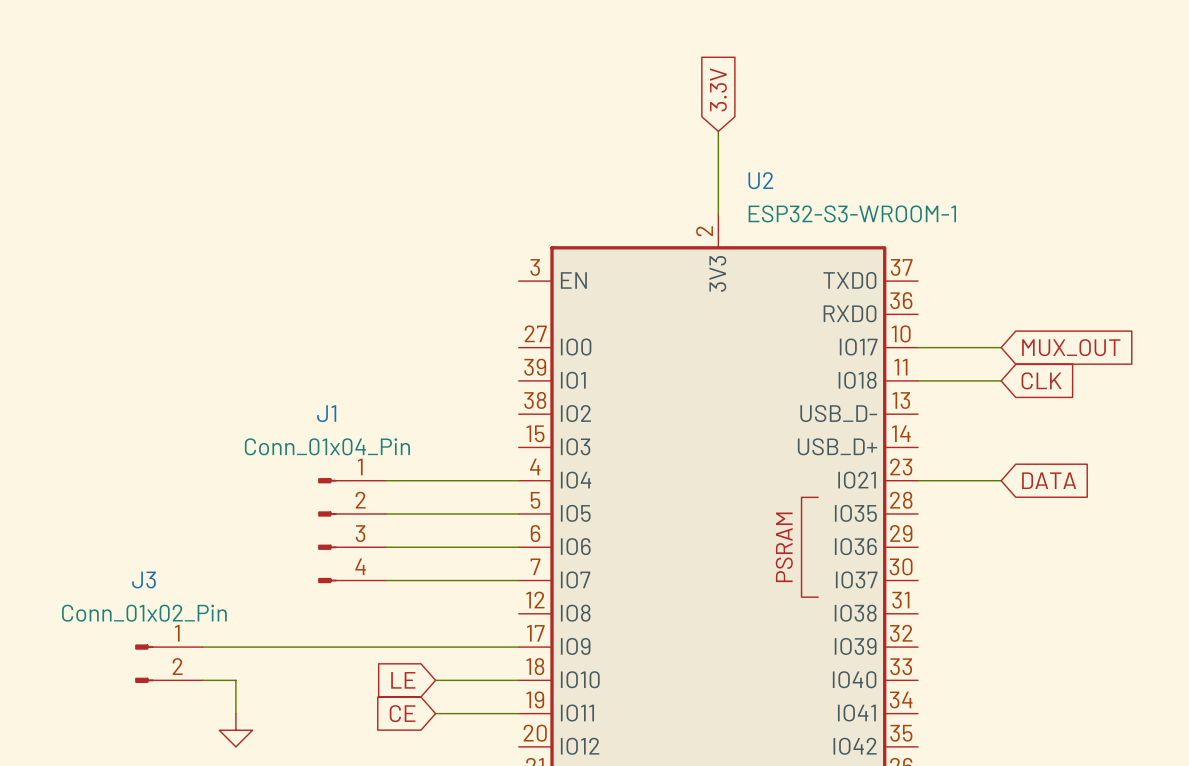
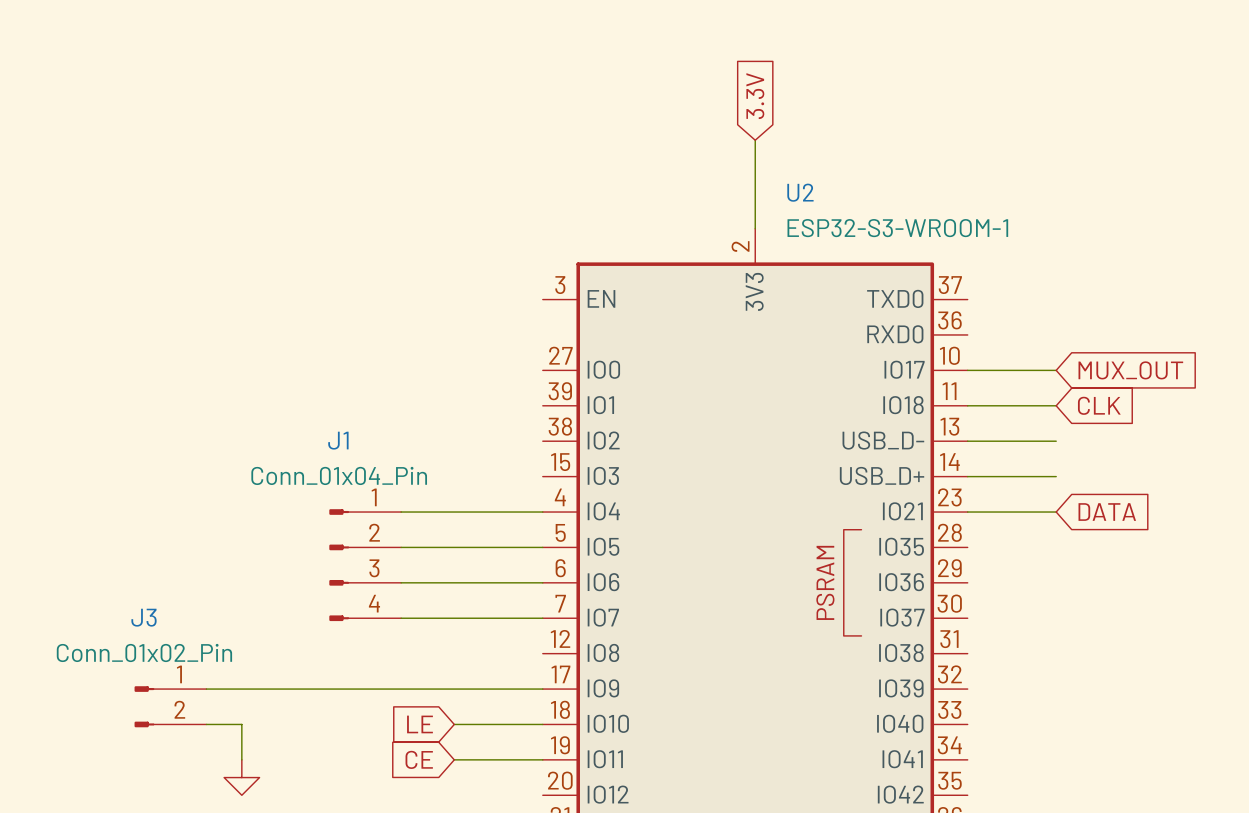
wire: none -> (967, 441) (1056, 441)
wire: none -> (967, 476) (1056, 476)

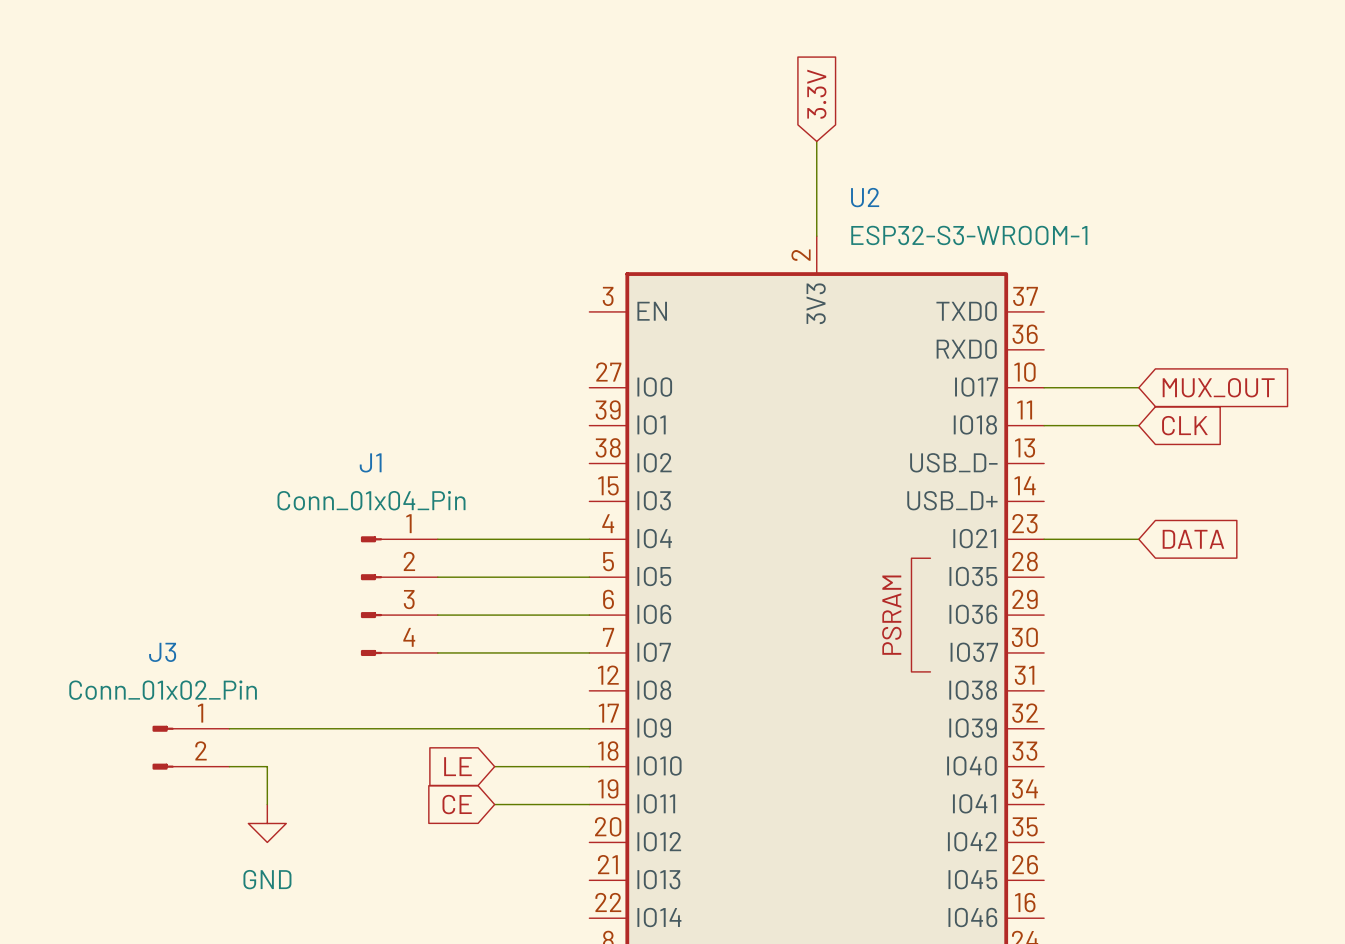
wire: (967, 441) (1056, 441) -> none
wire: (967, 476) (1056, 476) -> none

